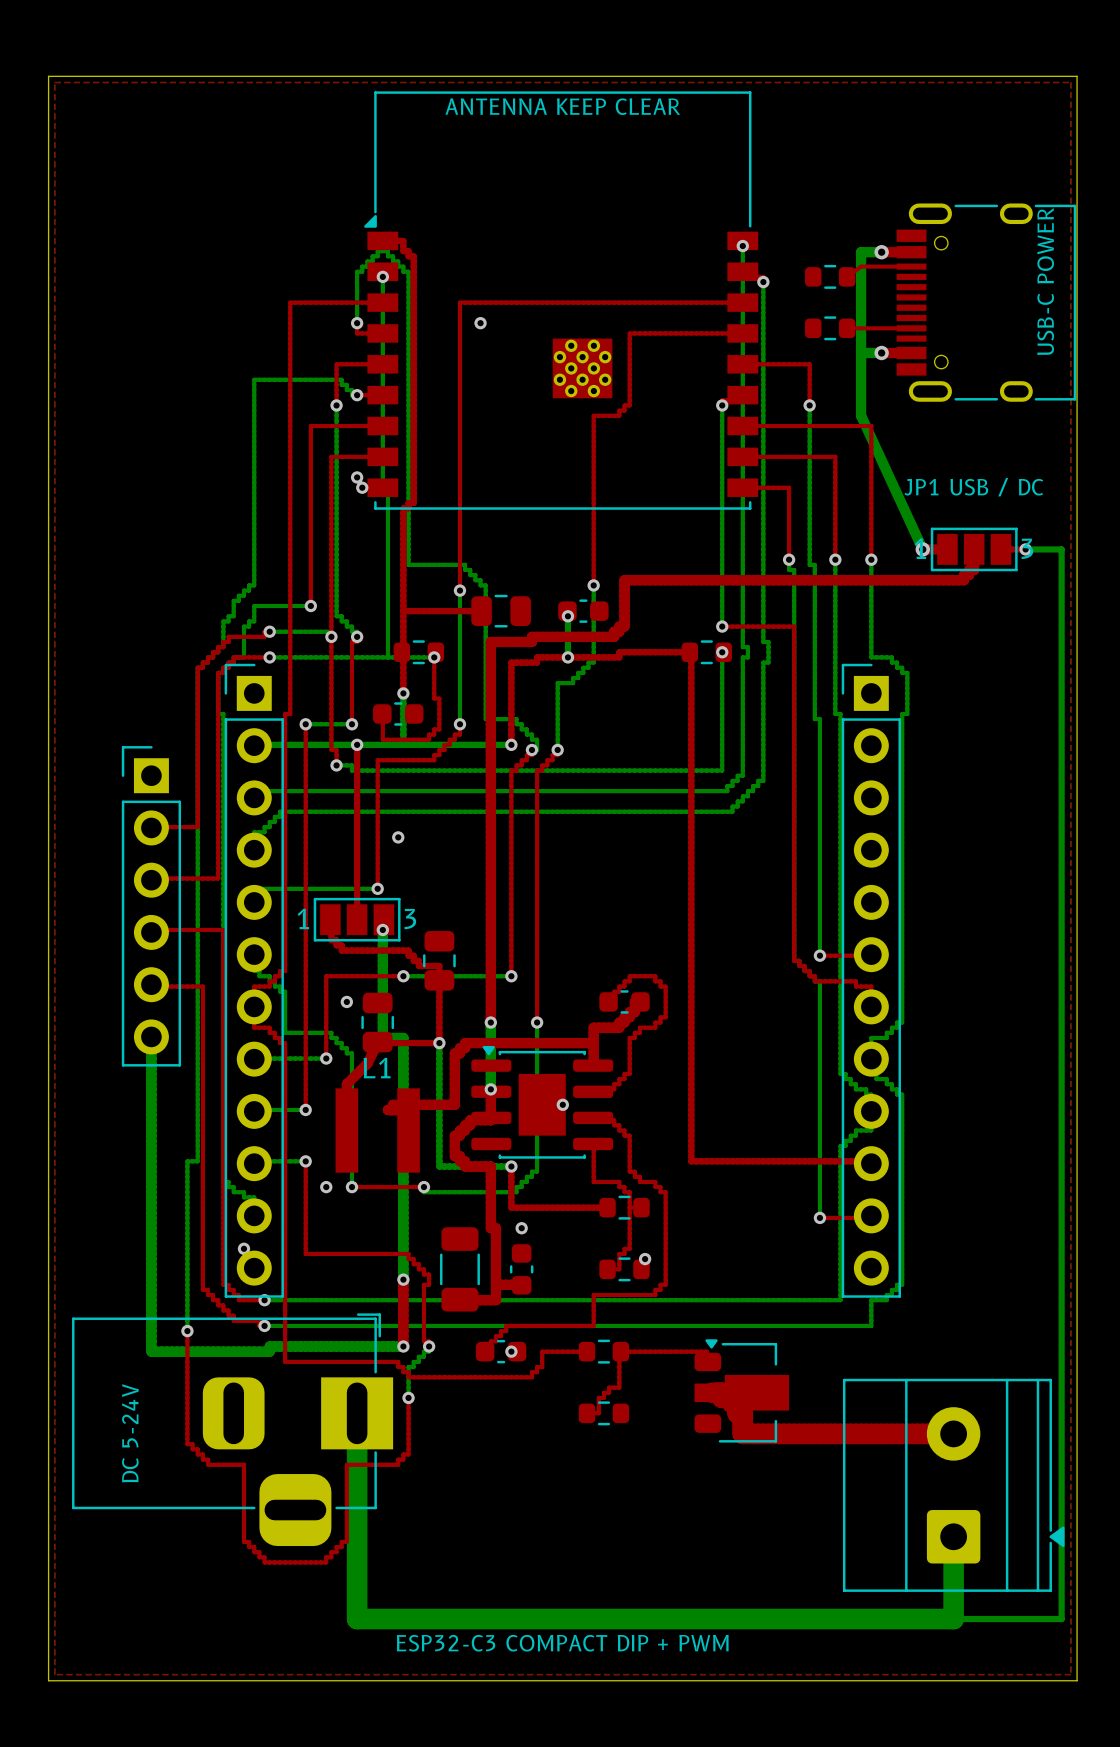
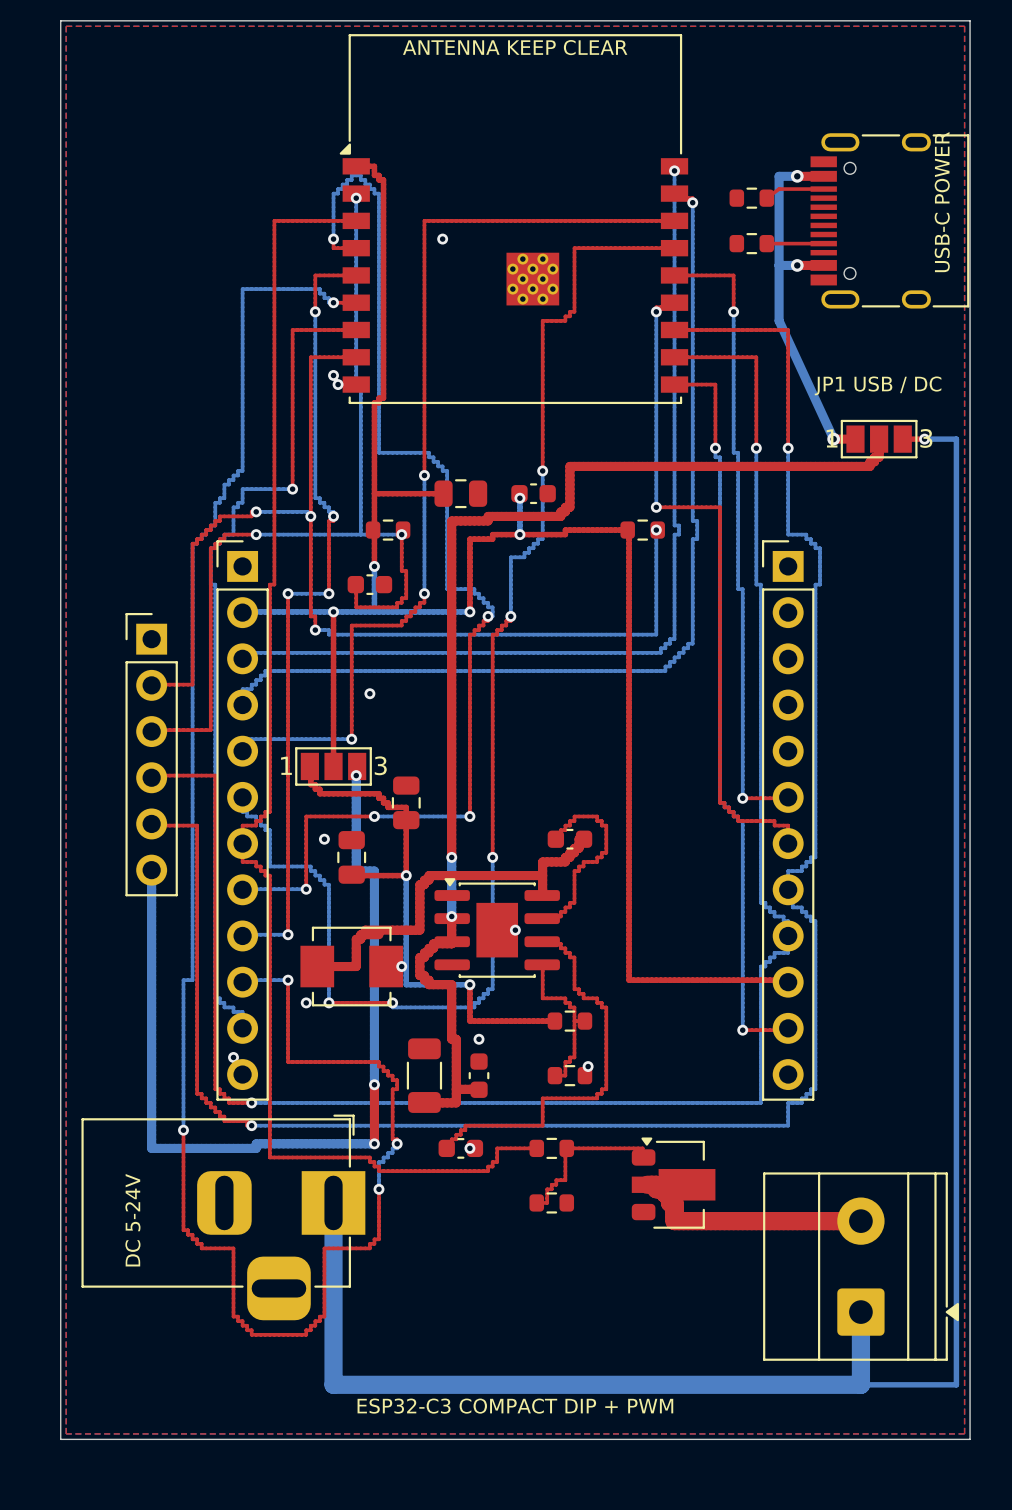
top track: (377, 1043) (367, 1063) (346, 1084) (346, 1130) -> none
top track: none -> (360, 934) (360, 939) (356, 939) (356, 966) (315, 966)
L1: (377, 1130) -> none
part: none -> (351, 966)
via: none -> (401, 966)

